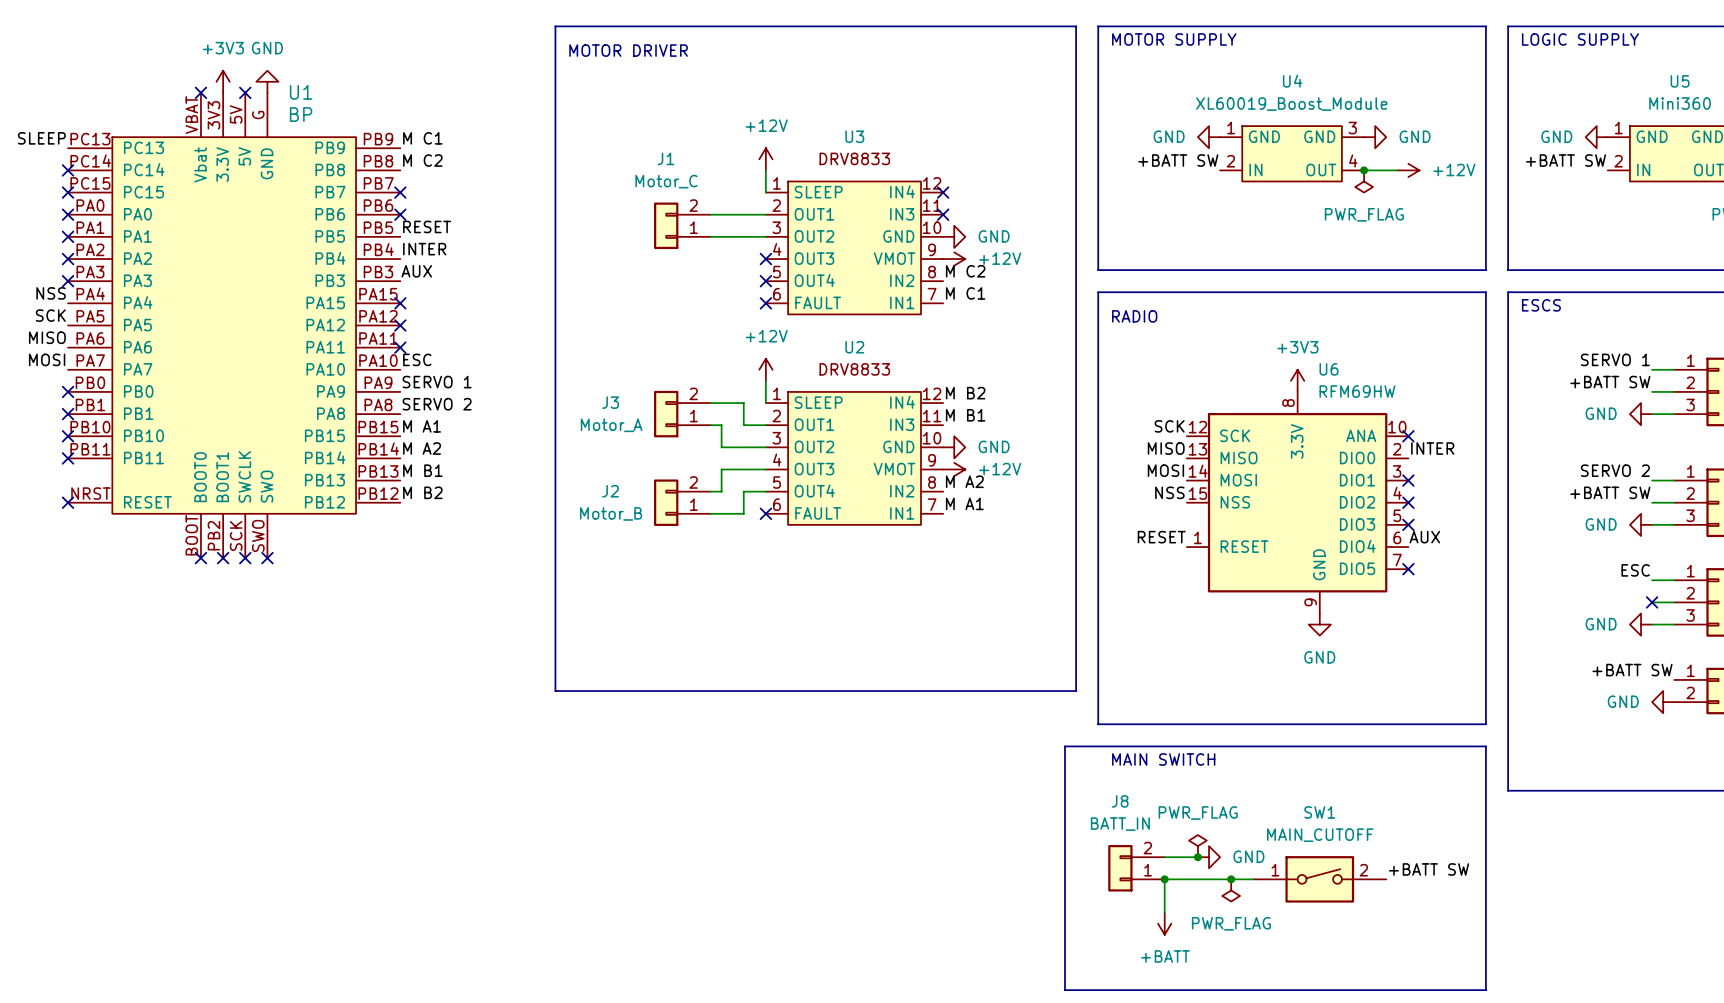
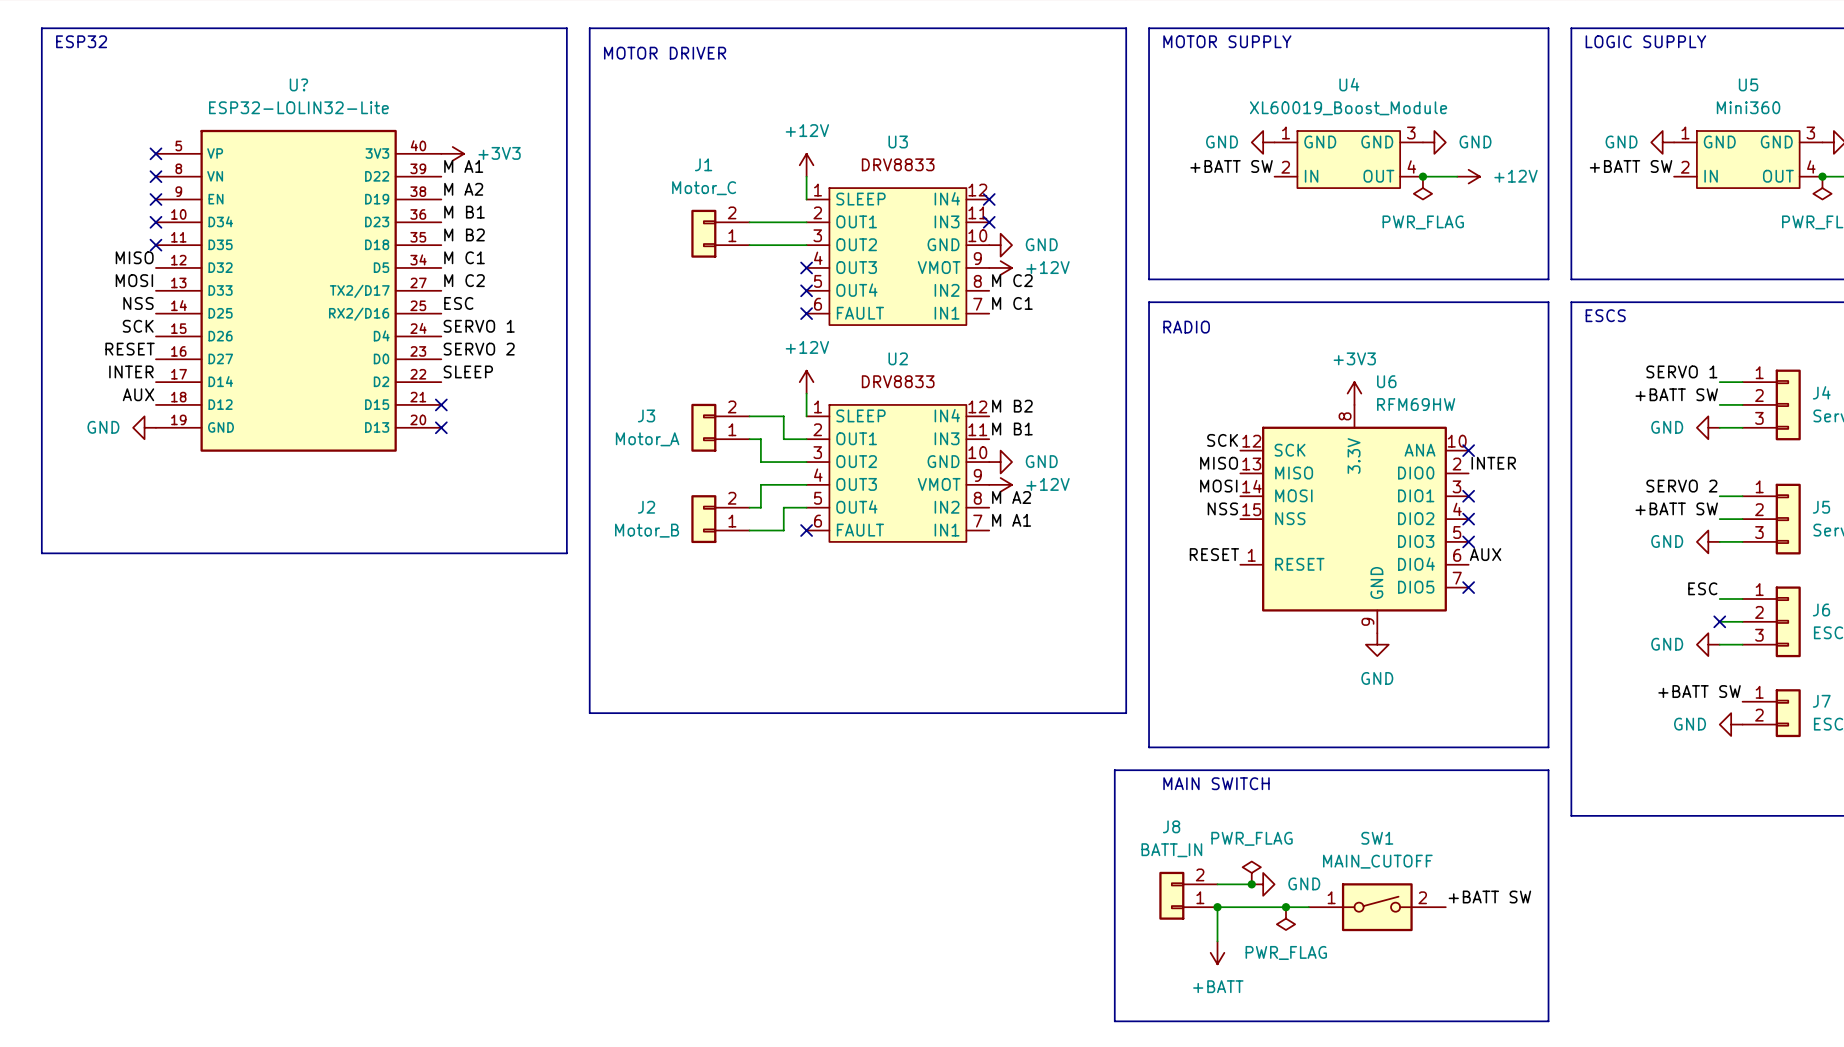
line: none -> (41, 28) (566, 28) (566, 553) (41, 553) (41, 28)
text: none -> ESP32 (81, 41)
power symbol rotation: 0° (223, 81) -> 90° clockwise (452, 153)
power symbol position: +3V3 (223, 81) -> +3V3 (452, 153)
power symbol: GND (267, 81) -> none
no-connect mark: (200, 92) -> none
no-connect mark: (245, 92) -> none
label: SLEEP (41, 138) -> none
label position: M C1 (422, 138) -> M C1 (464, 257)
no-connect mark: none -> (155, 153)
label position: M C2 (422, 160) -> M C2 (464, 280)
label: none -> M A1 (463, 166)
no-connect mark: (68, 170) -> none
no-connect mark: none -> (155, 176)
label: none -> M A2 (463, 189)
no-connect mark: (68, 192) -> none
no-connect mark: none -> (155, 199)
no-connect mark: (400, 192) -> none
label: none -> M B1 (464, 212)
no-connect mark: (68, 214) -> none
no-connect mark: none -> (155, 222)
no-connect mark: (400, 214) -> none
label: RESET (427, 226) -> none
label: none -> M B2 (464, 234)
no-connect mark: (68, 236) -> none
no-connect mark: none -> (155, 245)
label: INTER (424, 249) -> none
no-connect mark: (68, 259) -> none
label: AUX (416, 271) -> none
no-connect mark: (68, 281) -> none
U?: none -> ESP32-LOLIN32-Lite (298, 290)
label position: NSS (51, 293) -> NSS (138, 303)
no-connect mark: (400, 303) -> none
label position: SCK (50, 315) -> SCK (138, 326)
U1: BP (234, 325) -> none
no-connect mark: (400, 325) -> none
label position: MISO (47, 337) -> MISO (134, 257)
label: none -> RESET (130, 349)
no-connect mark: (400, 347) -> none
label position: MOSI (47, 359) -> MOSI (134, 280)
label: none -> INTER (131, 371)
label position: ESC (417, 359) -> ESC (458, 303)
label: none -> SLEEP (468, 371)
label: none -> AUX (138, 394)
label position: SERVO 1 (437, 382) -> SERVO 1 (479, 326)
no-connect mark: (68, 391) -> none
no-connect mark: none -> (441, 404)
label position: SERVO 2 (437, 404) -> SERVO 2 (479, 349)
no-connect mark: (68, 414) -> none
power symbol: none -> GND (144, 427)
no-connect mark: none -> (441, 427)
label: M A1 (422, 426) -> none
no-connect mark: (68, 436) -> none
label: M A2 (422, 448) -> none
no-connect mark: (68, 458) -> none
label: M B1 (422, 470) -> none
label: M B2 (422, 492) -> none
no-connect mark: (68, 502) -> none
no-connect mark: (200, 558) -> none
no-connect mark: (223, 558) -> none
no-connect mark: (245, 558) -> none
no-connect mark: (267, 558) -> none

